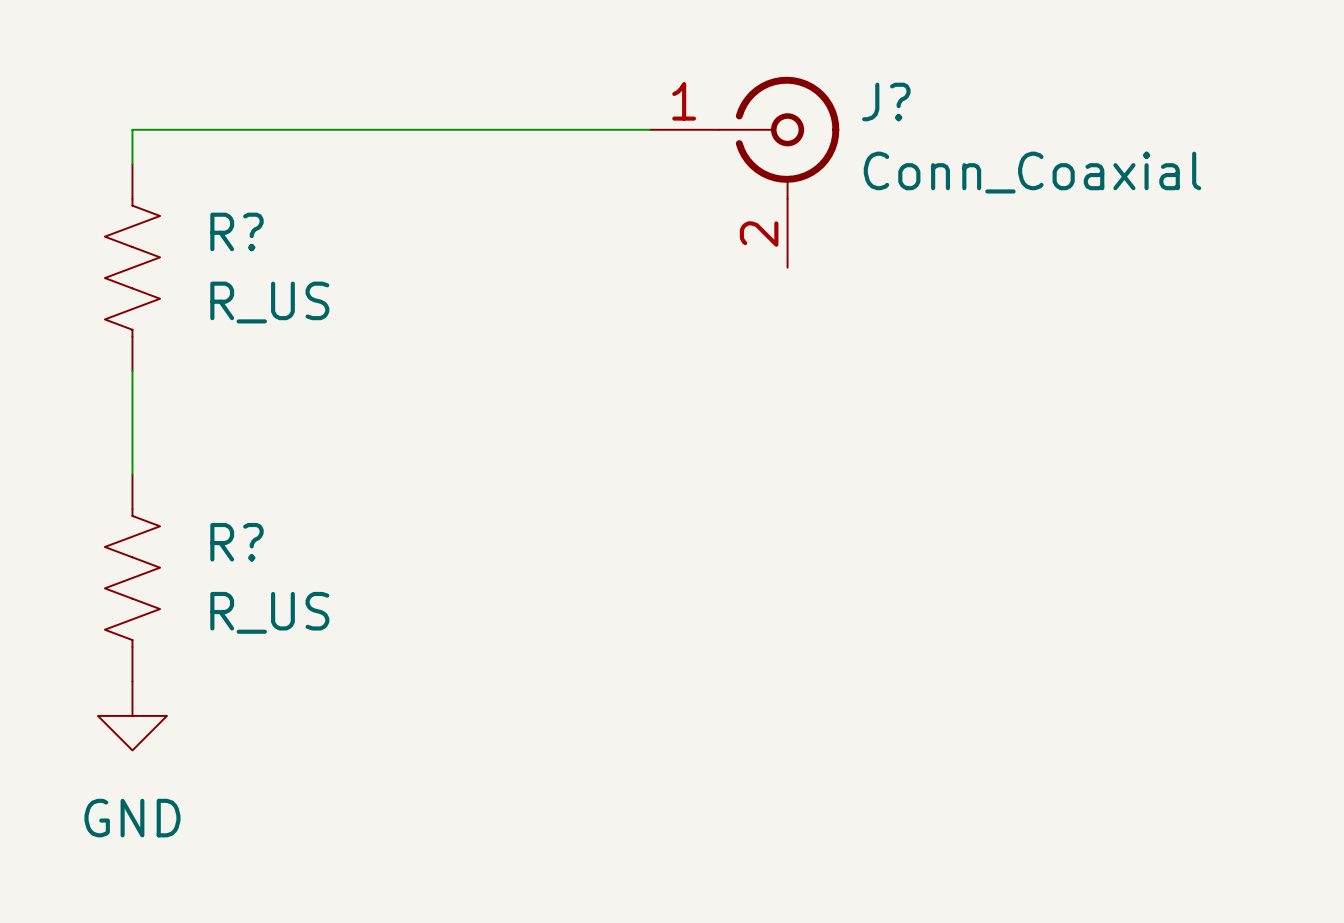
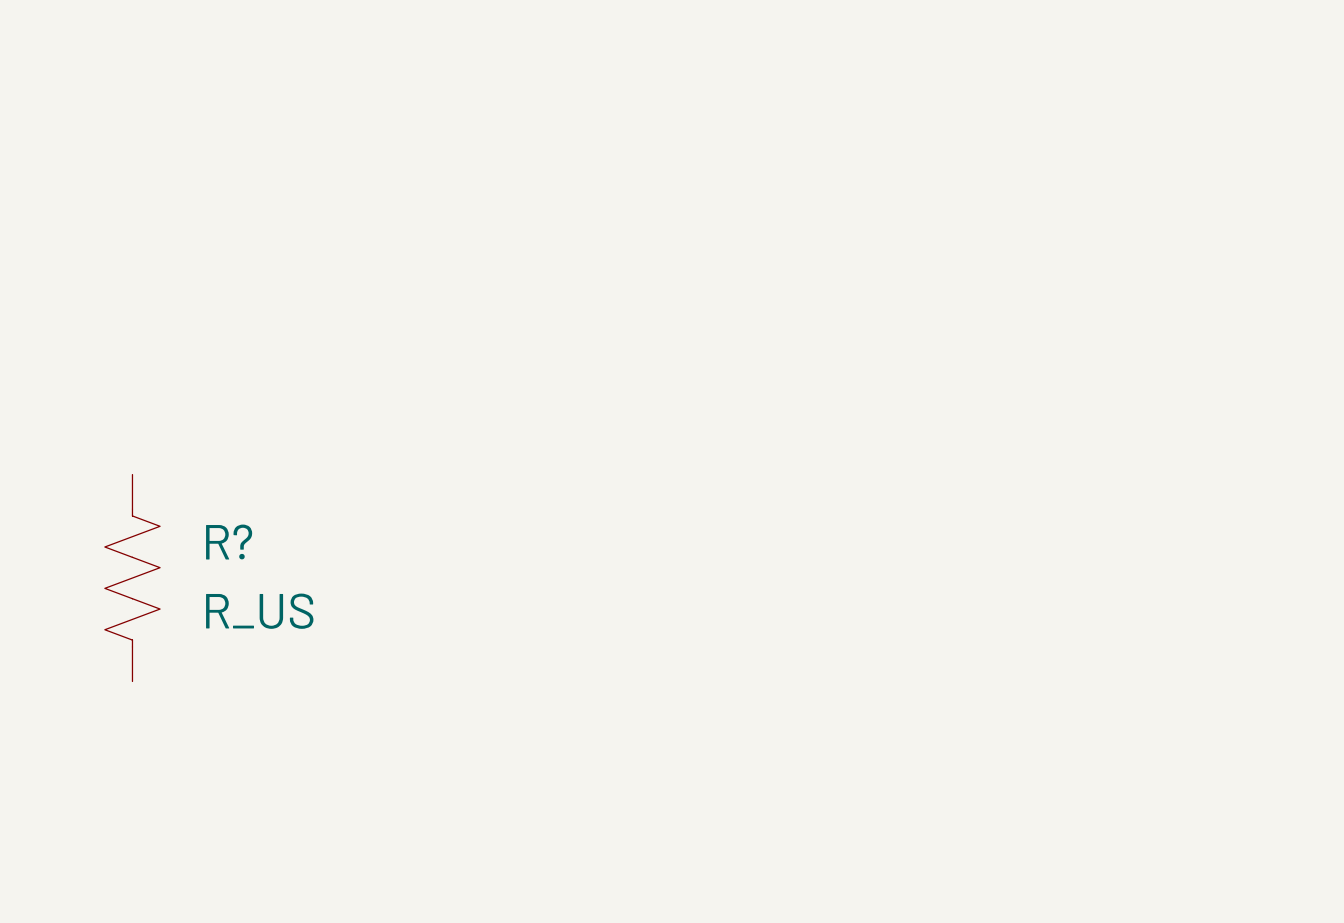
wire: (649, 129) (132, 129) (132, 164) -> none
J?: Conn_Coaxial (744, 172) -> none
R?: R_US (132, 267) -> none
wire: (132, 371) (132, 474) -> none
power symbol: GND (132, 715) -> none

